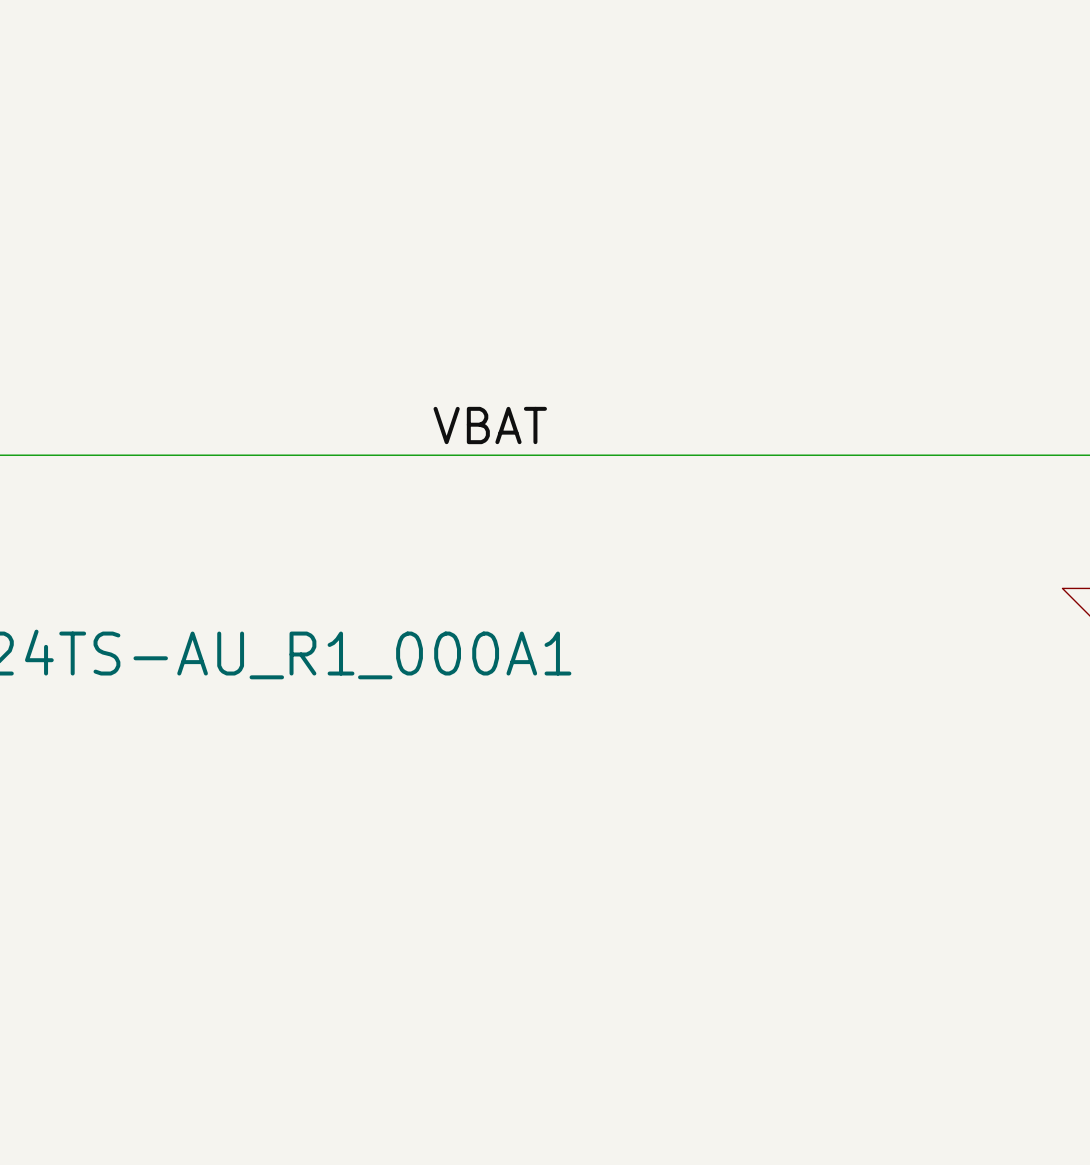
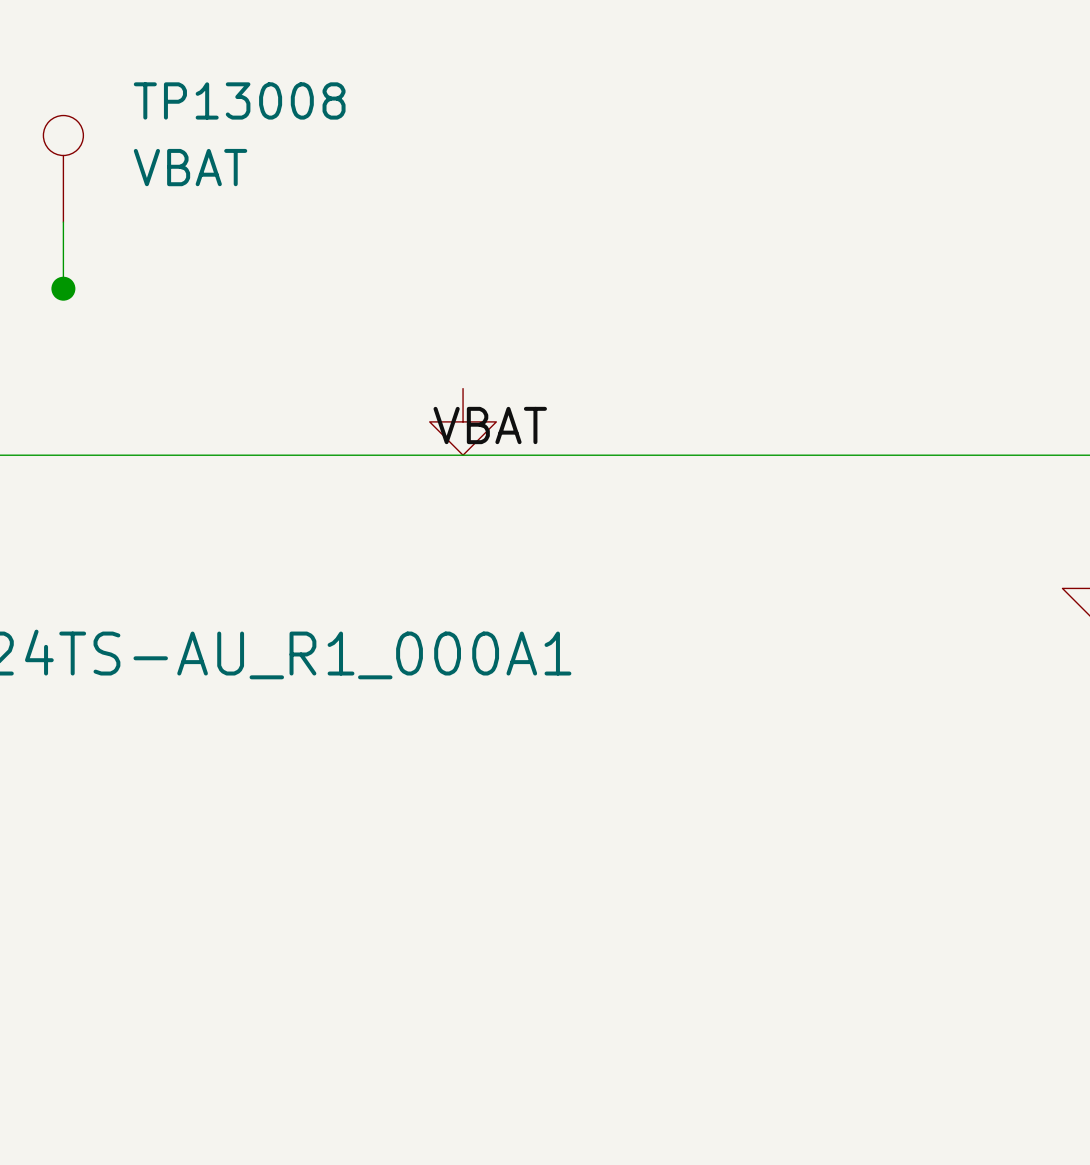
TP13008: none -> VBAT (63, 168)
wire: none -> (63, 222) (63, 288)
junction: none -> (63, 288)
power symbol: none -> (463, 421)

